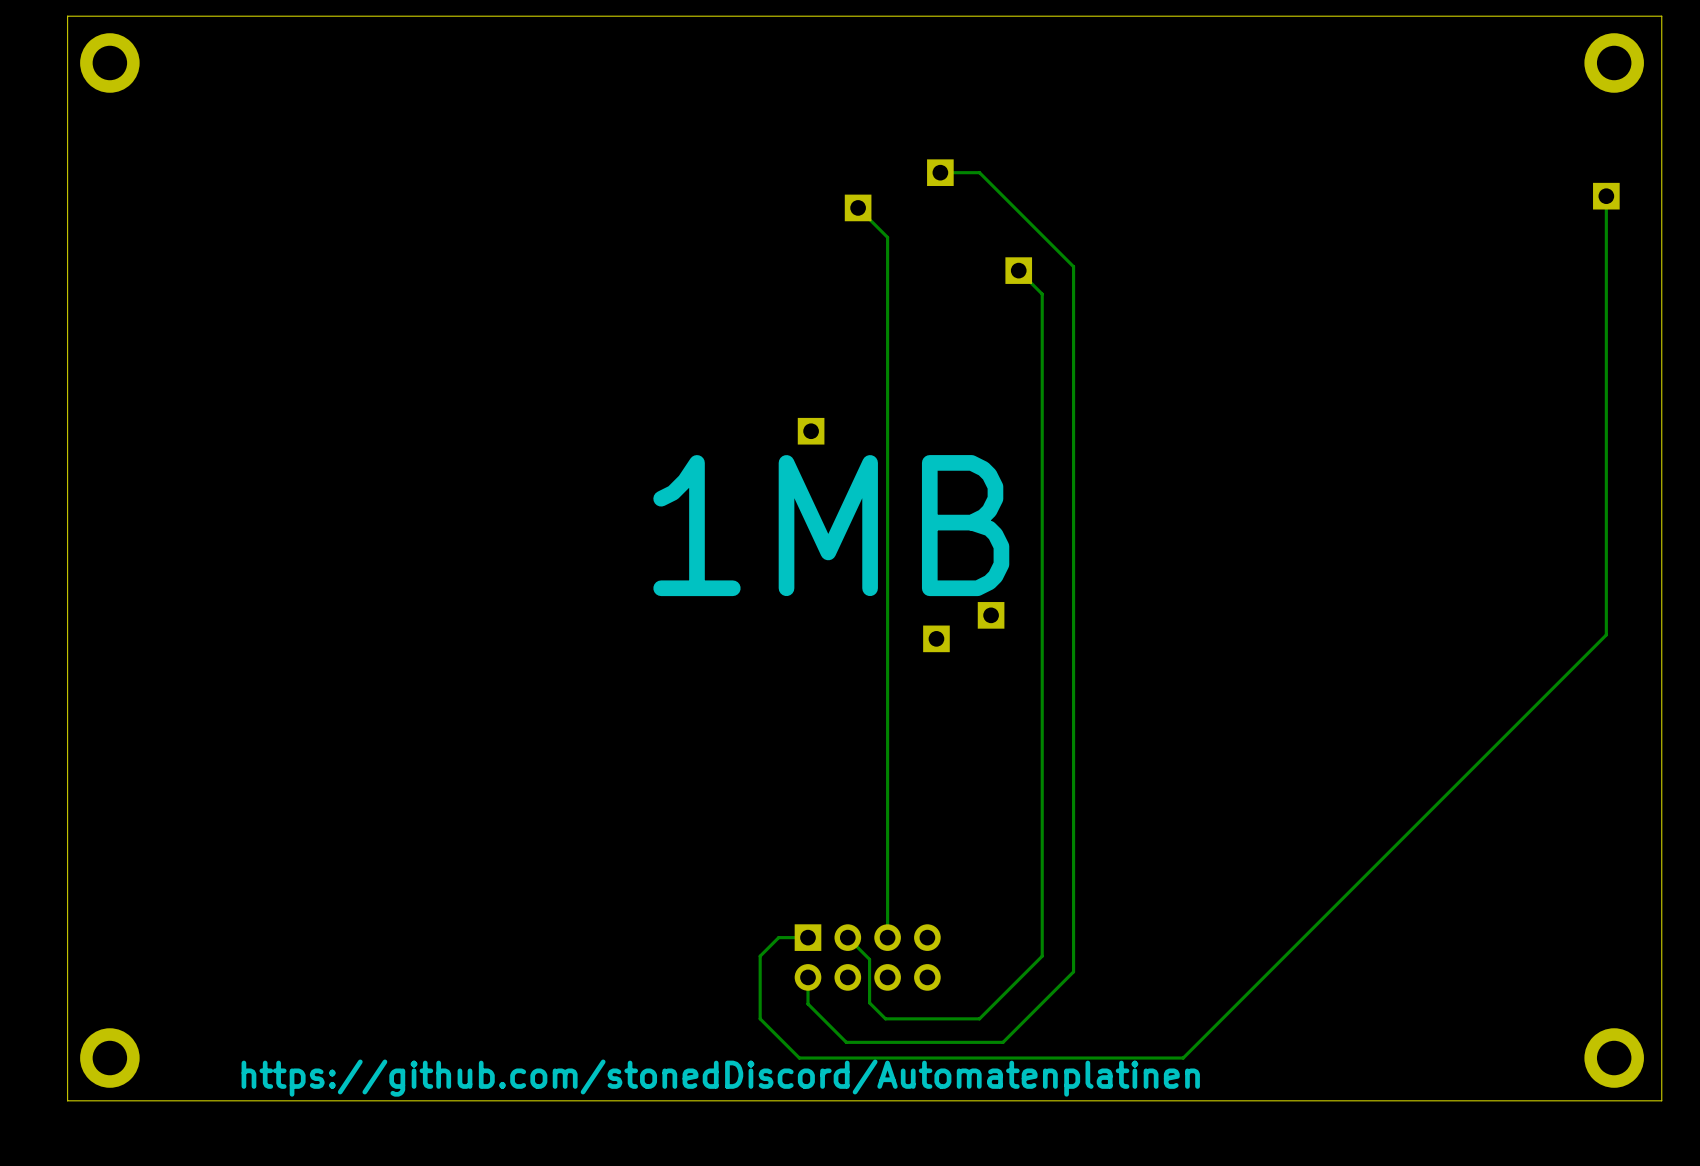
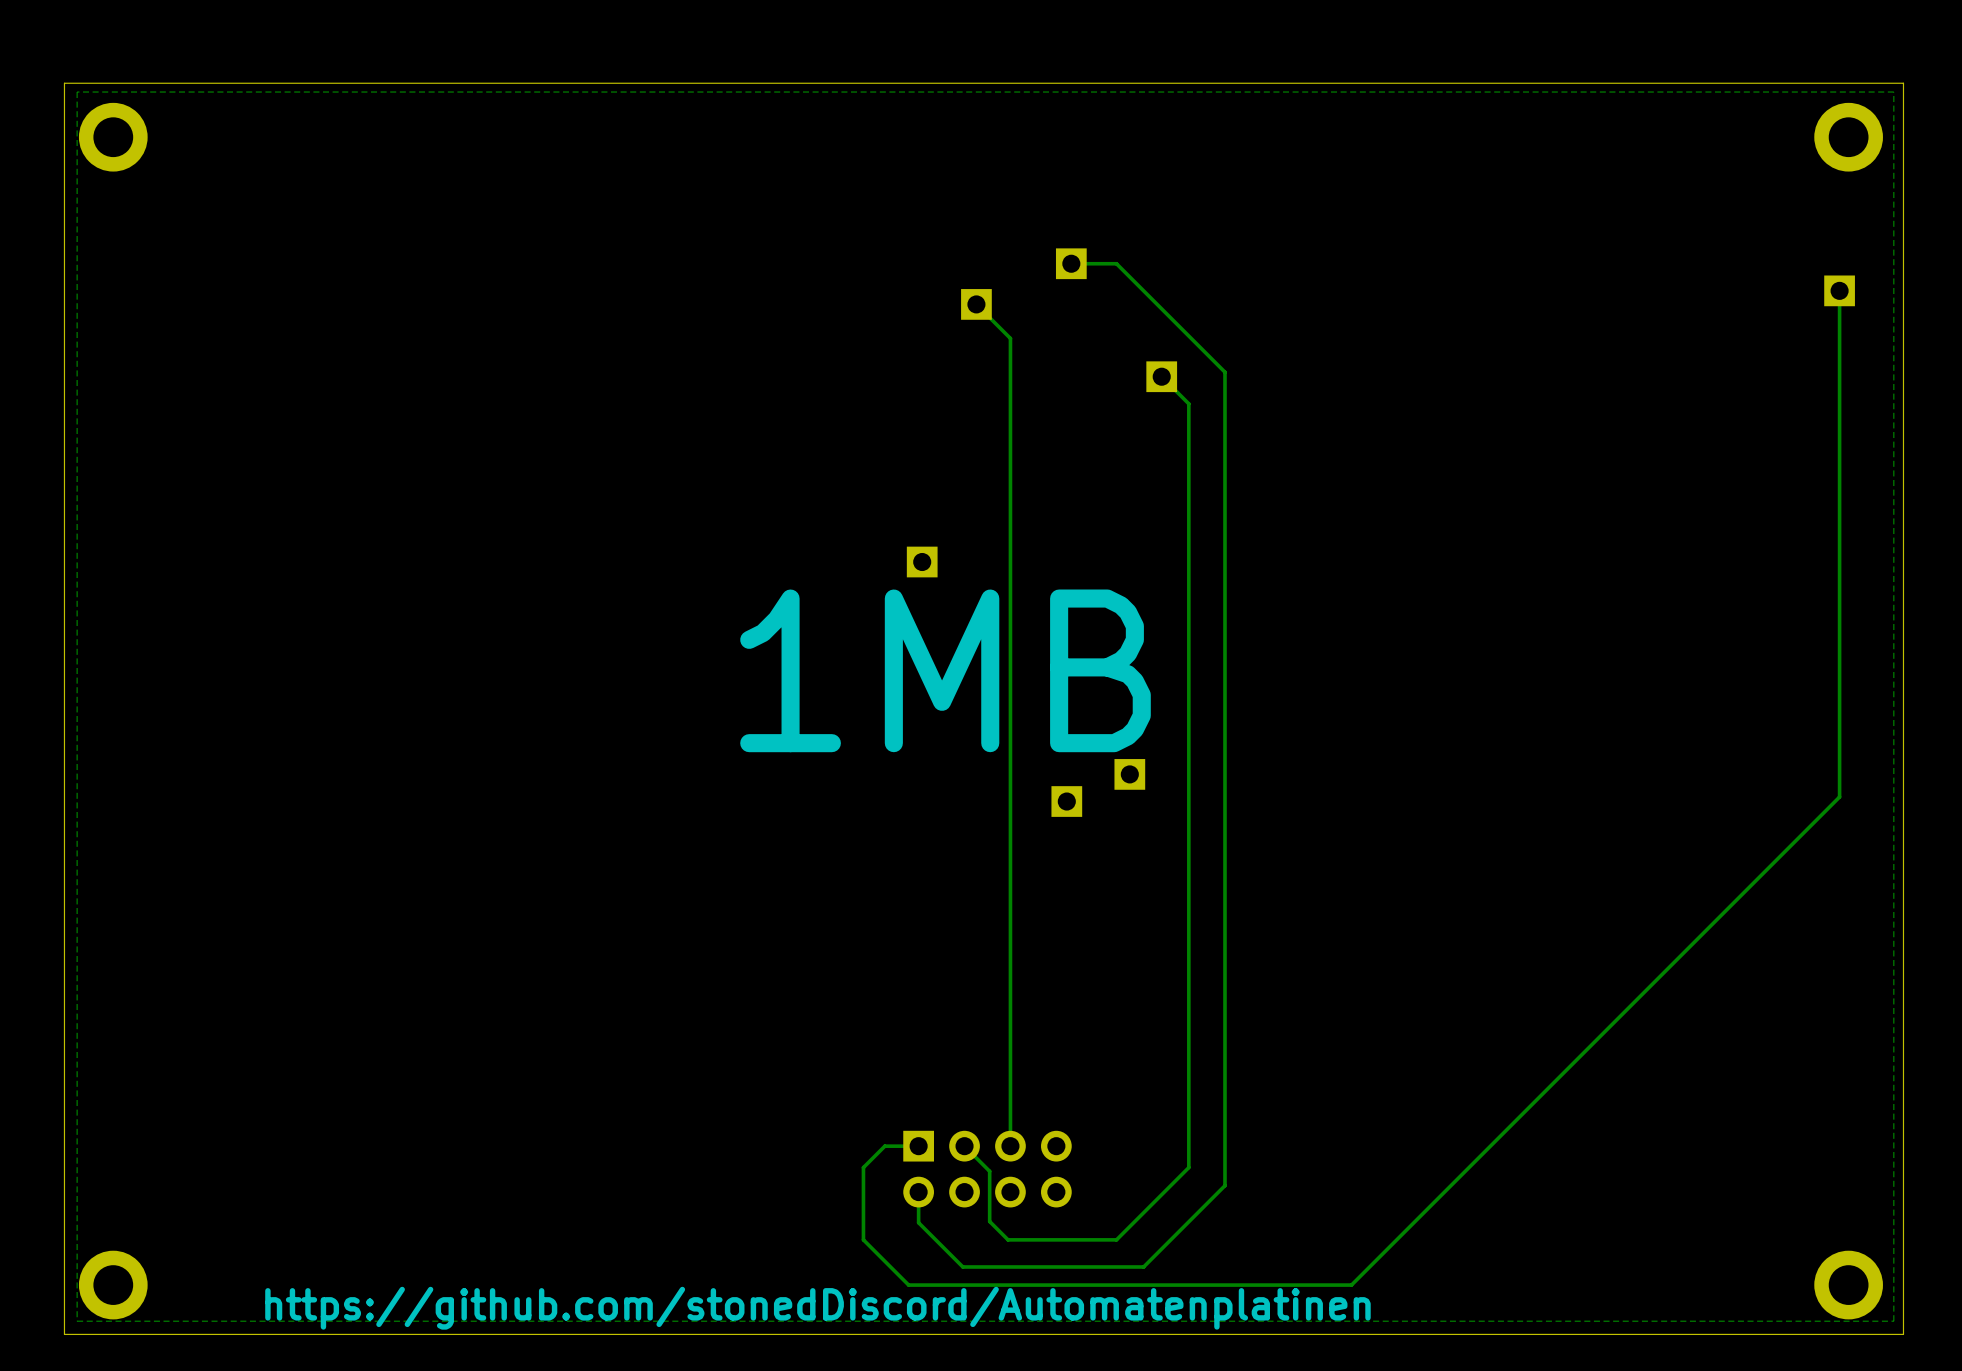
zone outline: none -> (1893, 92) (77, 92) (77, 1321) (1893, 1321) (1893, 92)

